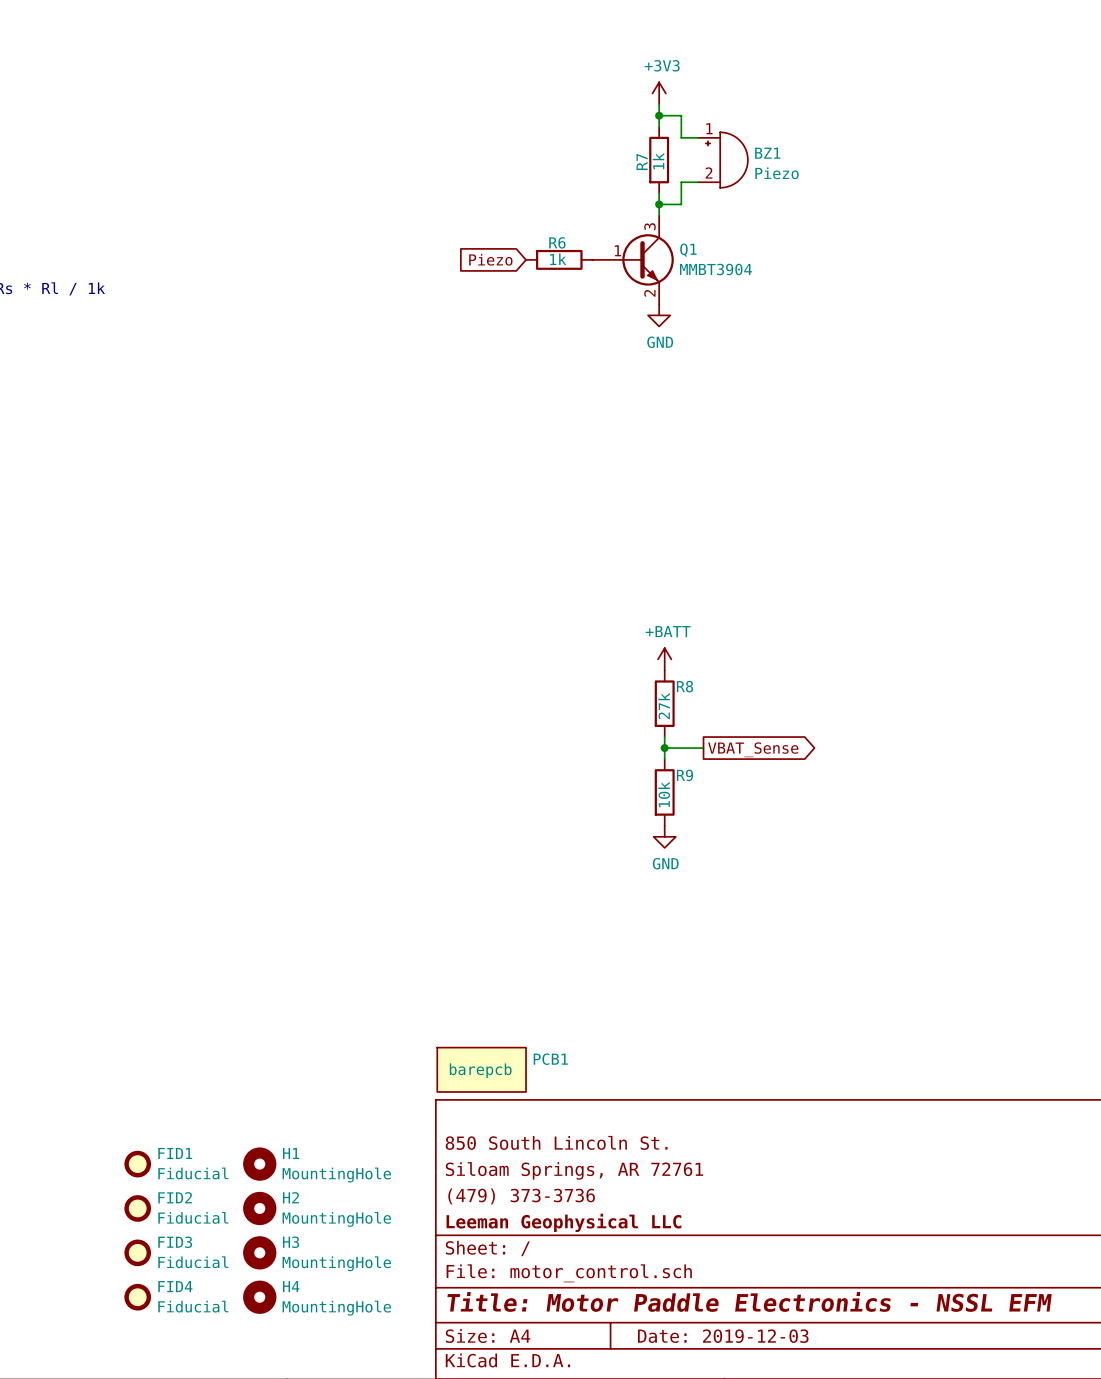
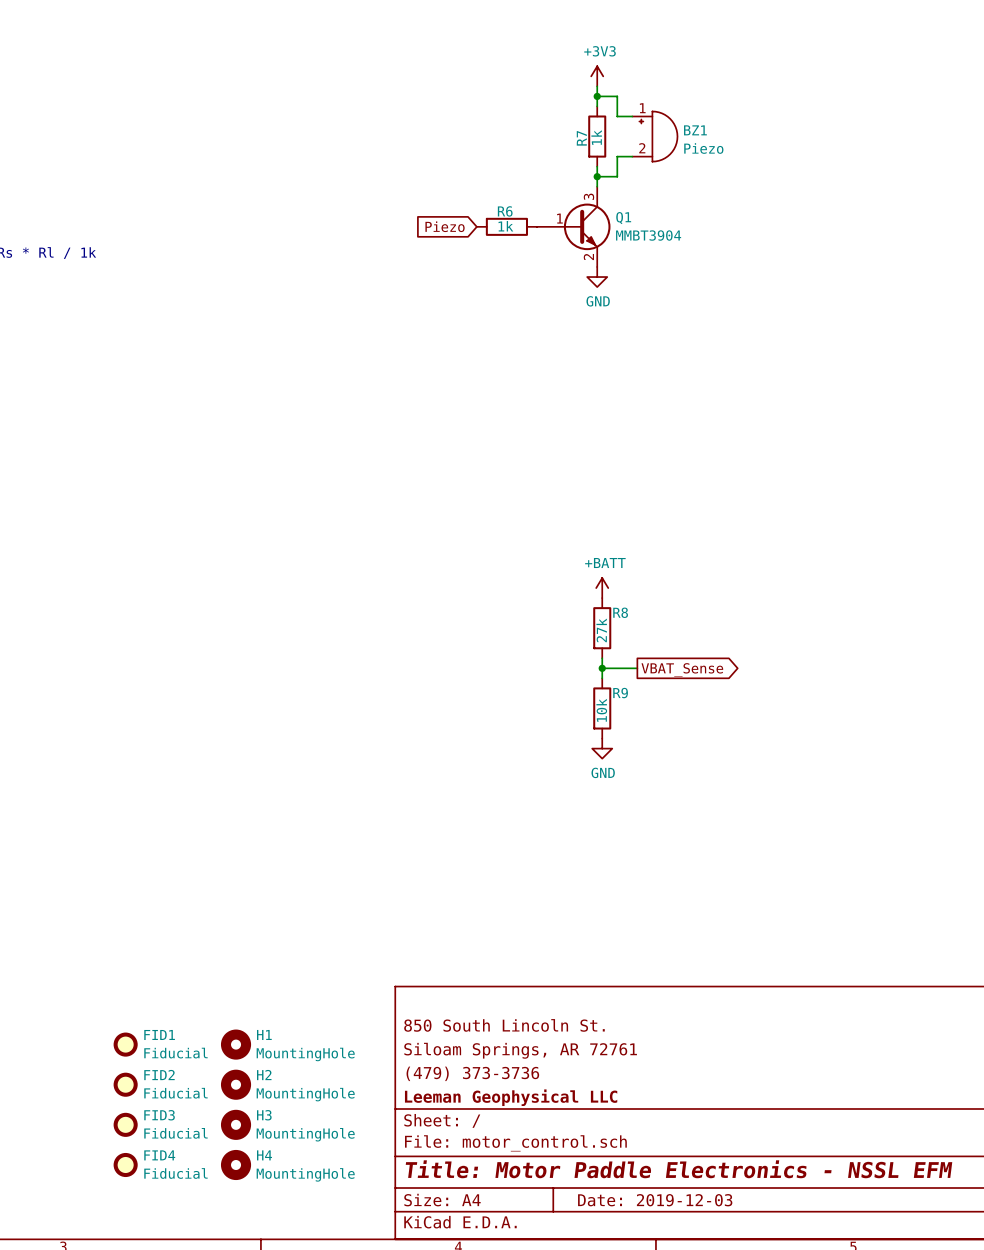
PCB1: barepcb (481, 1069) -> none

